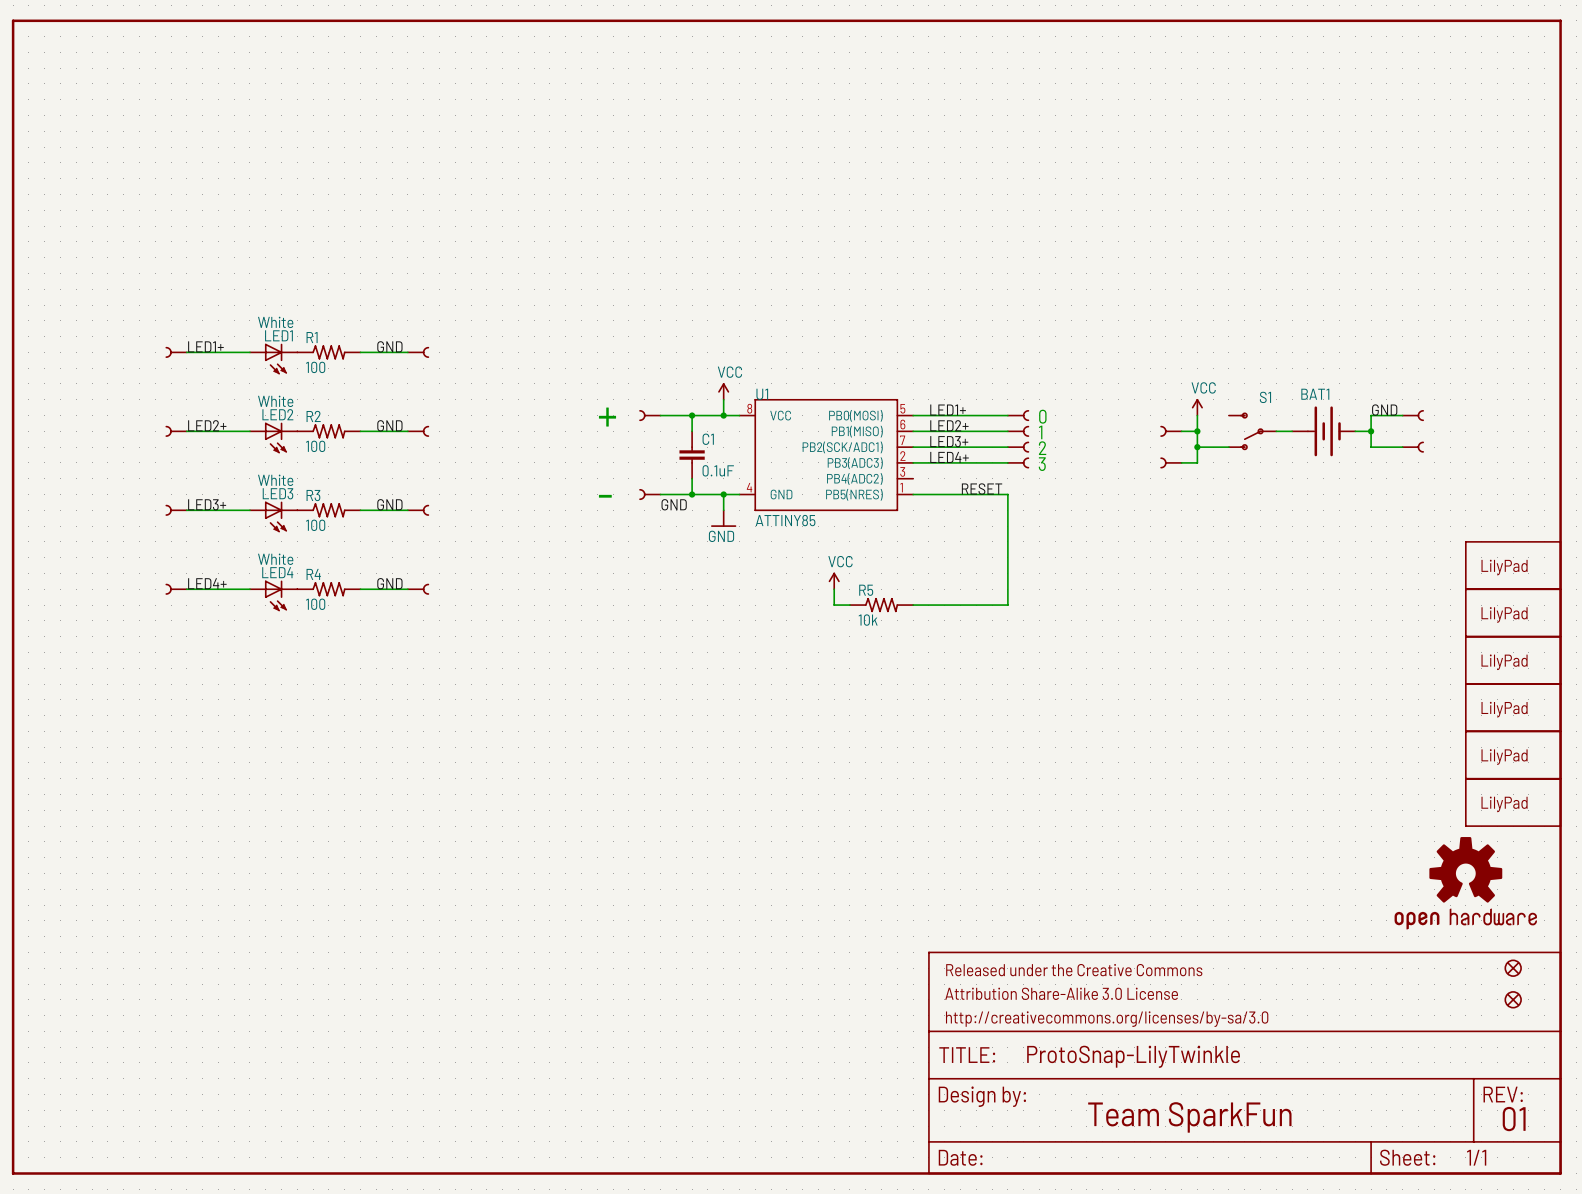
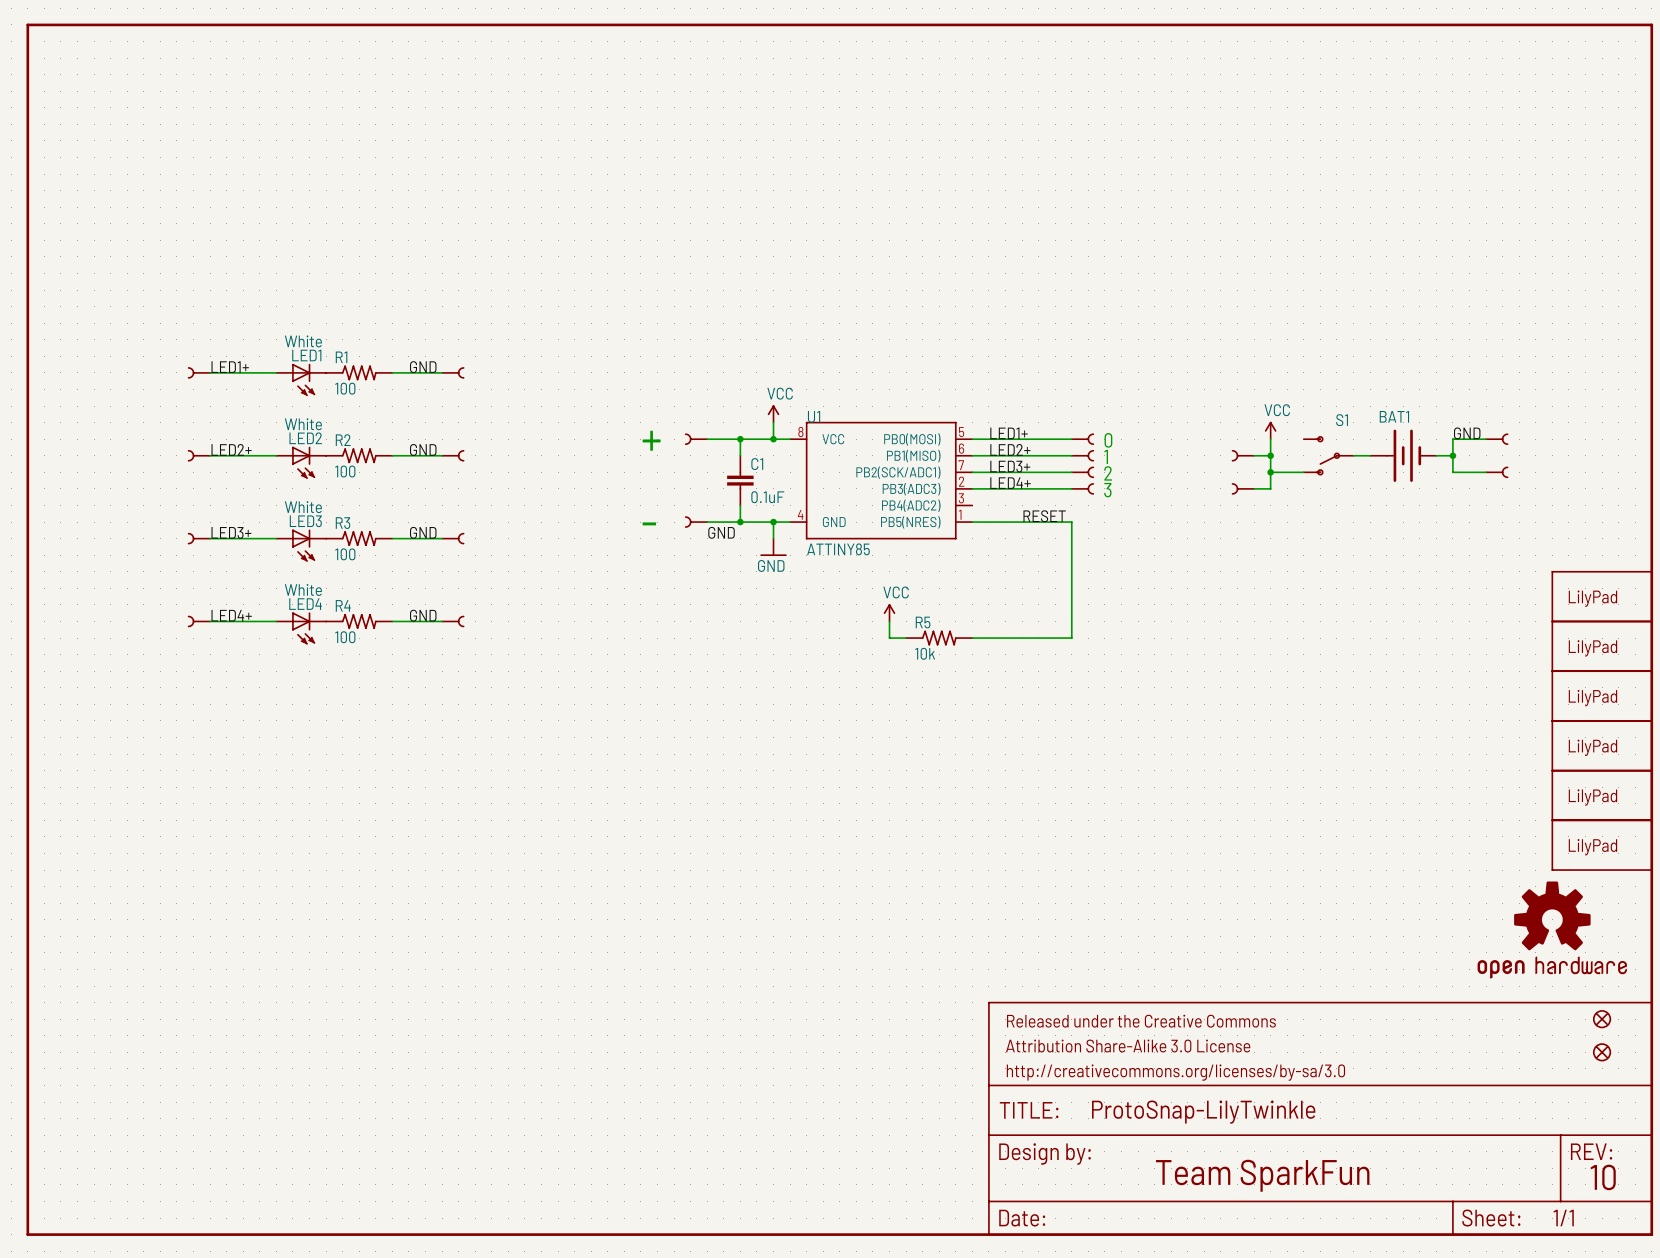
text: 01 (1514, 1119) -> 10 (1603, 1177)

